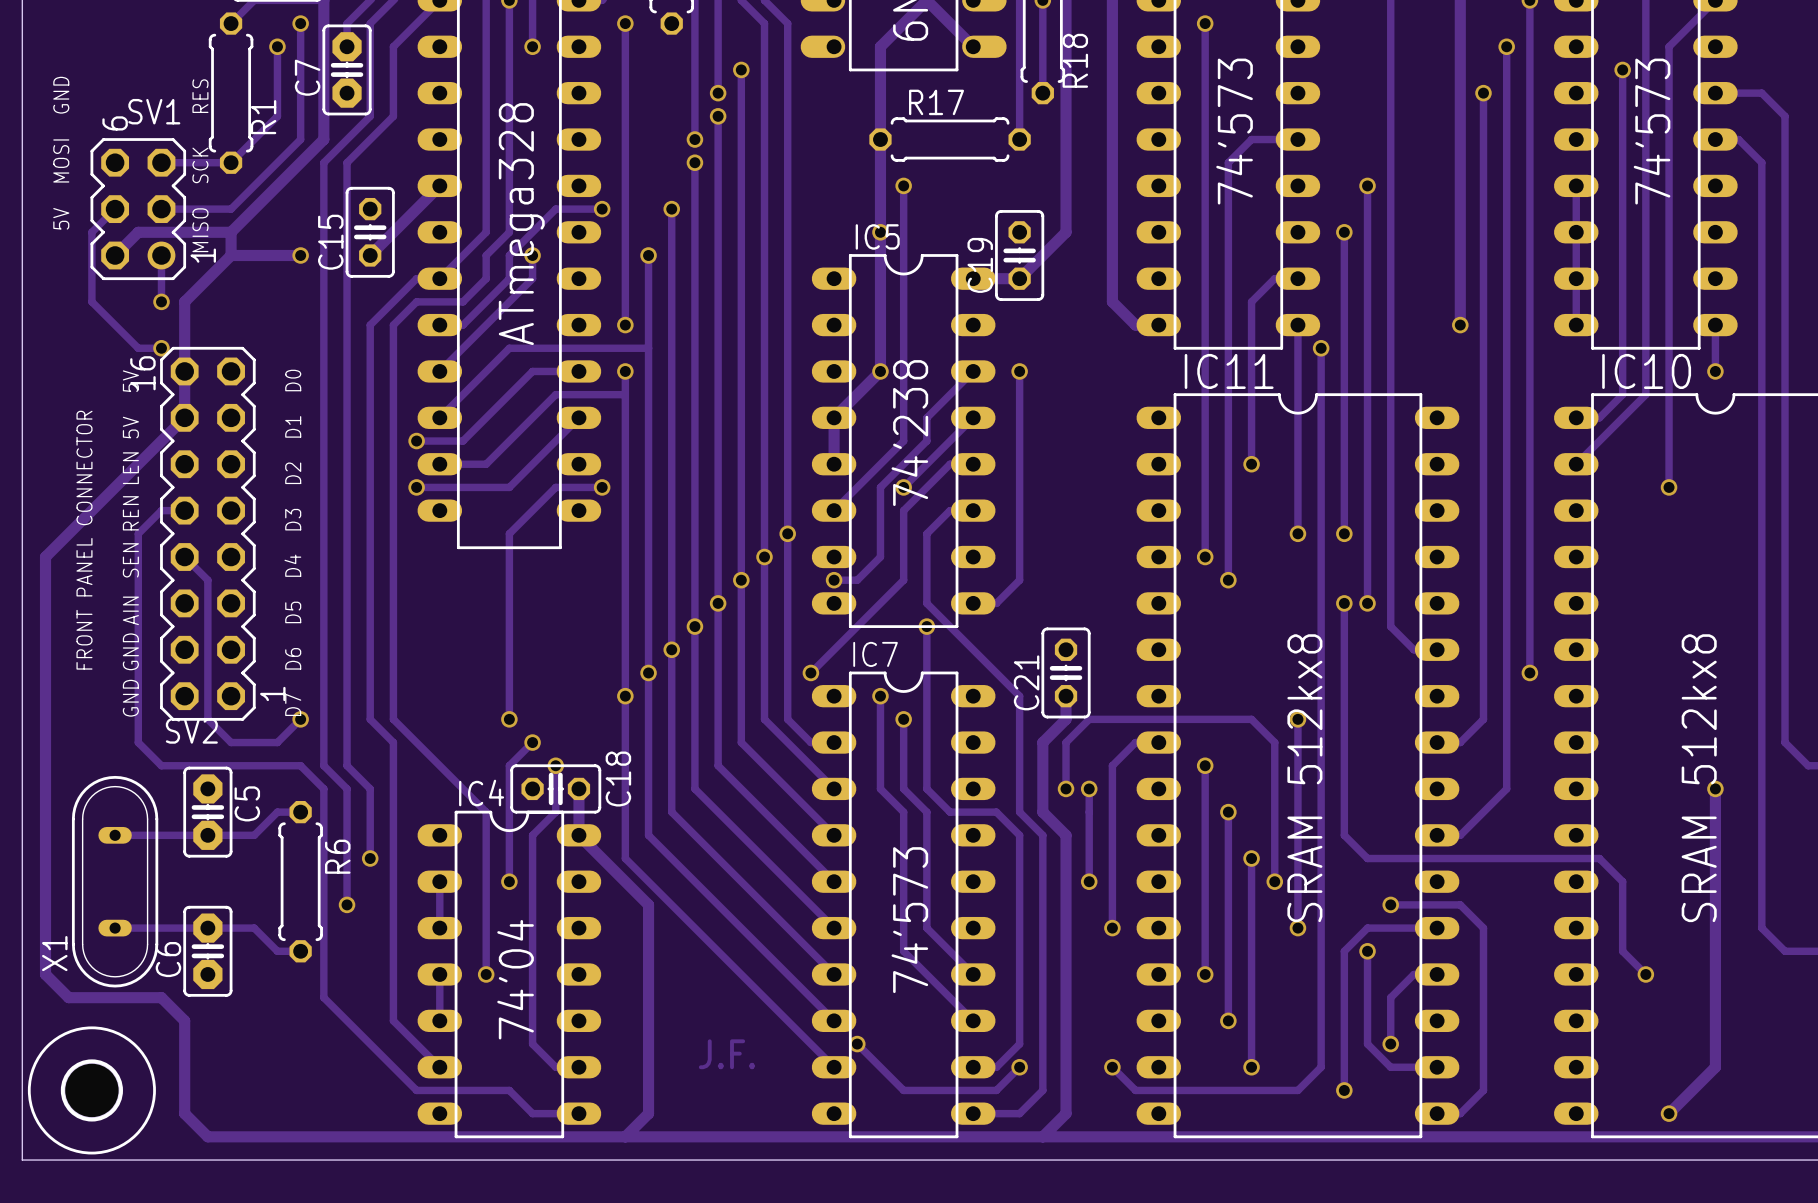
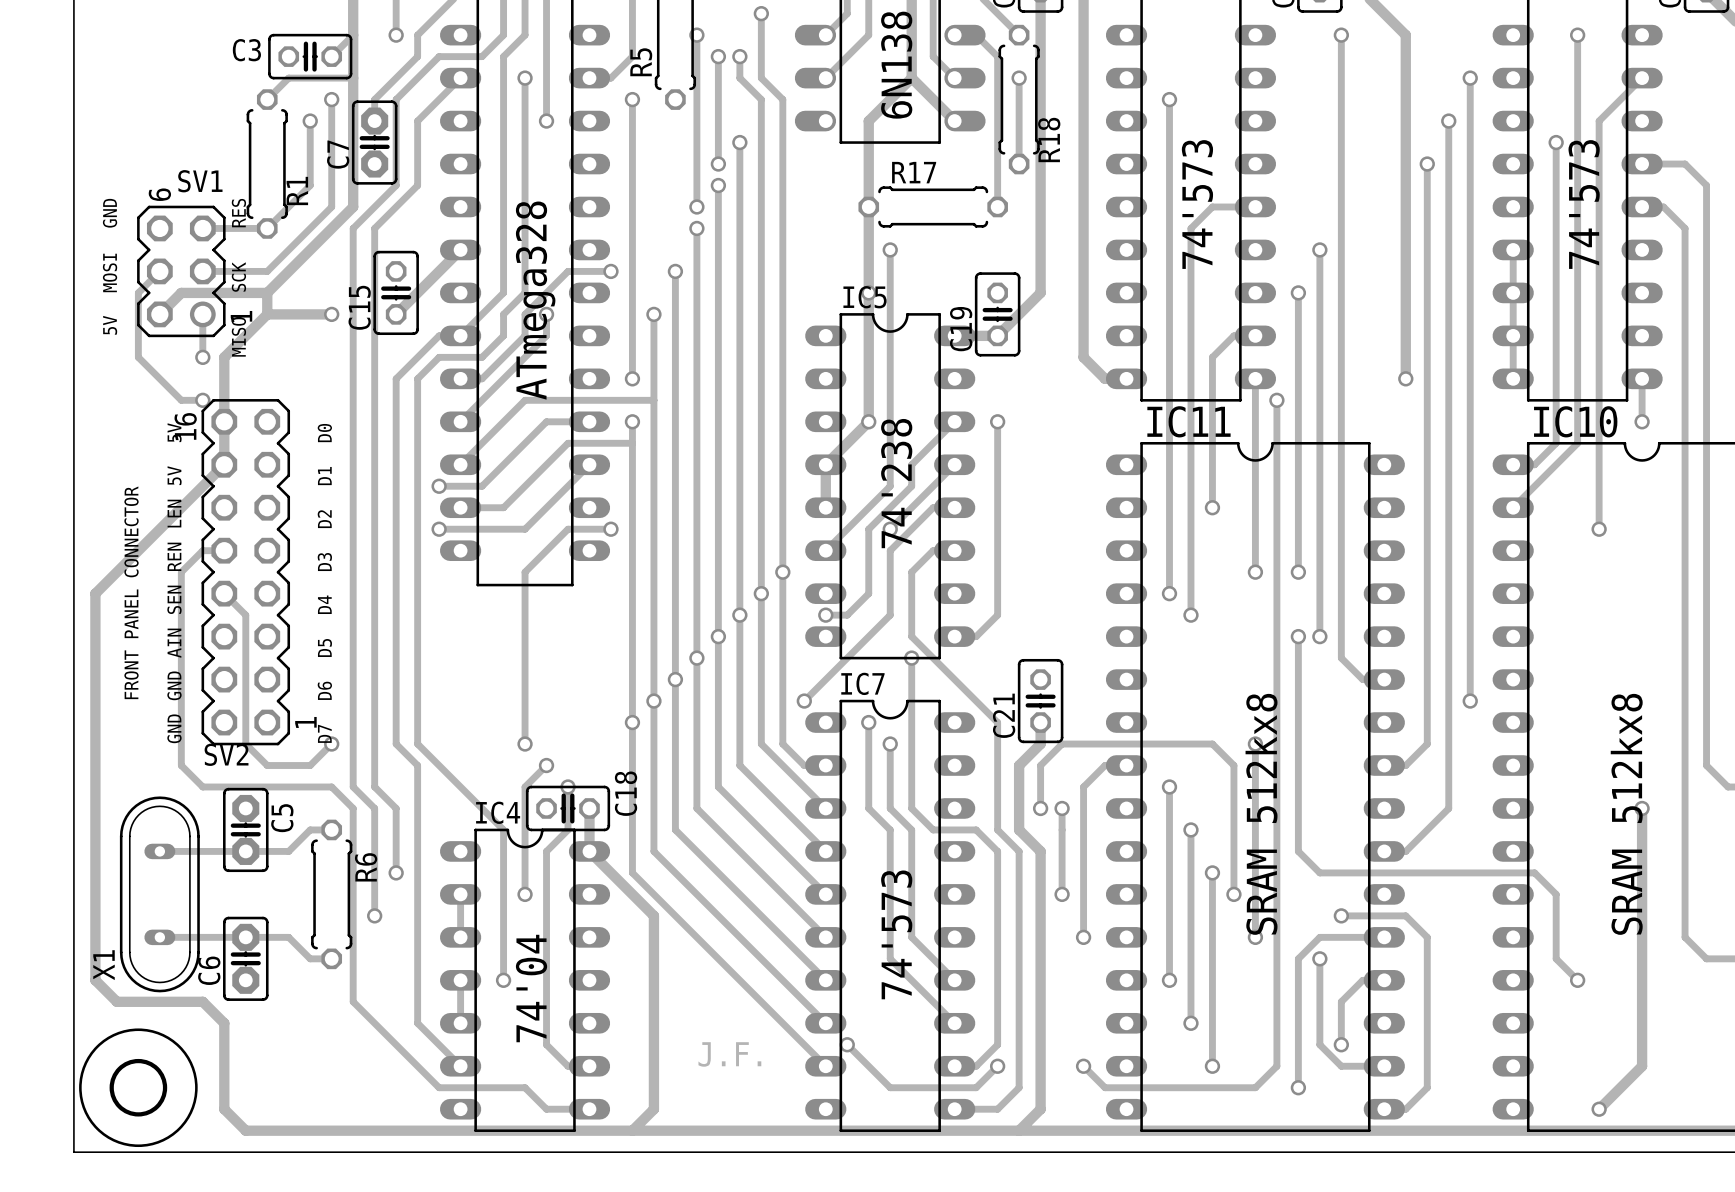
text position: GND (61, 95) -> GND (110, 213)
text position: RES (200, 96) -> RES (238, 213)
text: MOSI (61, 160) -> none
text position: SCK (200, 165) -> SCK (238, 277)
text: 5V (61, 218) -> MOSI (110, 272)
text position: MISO (200, 230) -> MISO (238, 337)
text: none -> 5V (110, 325)

